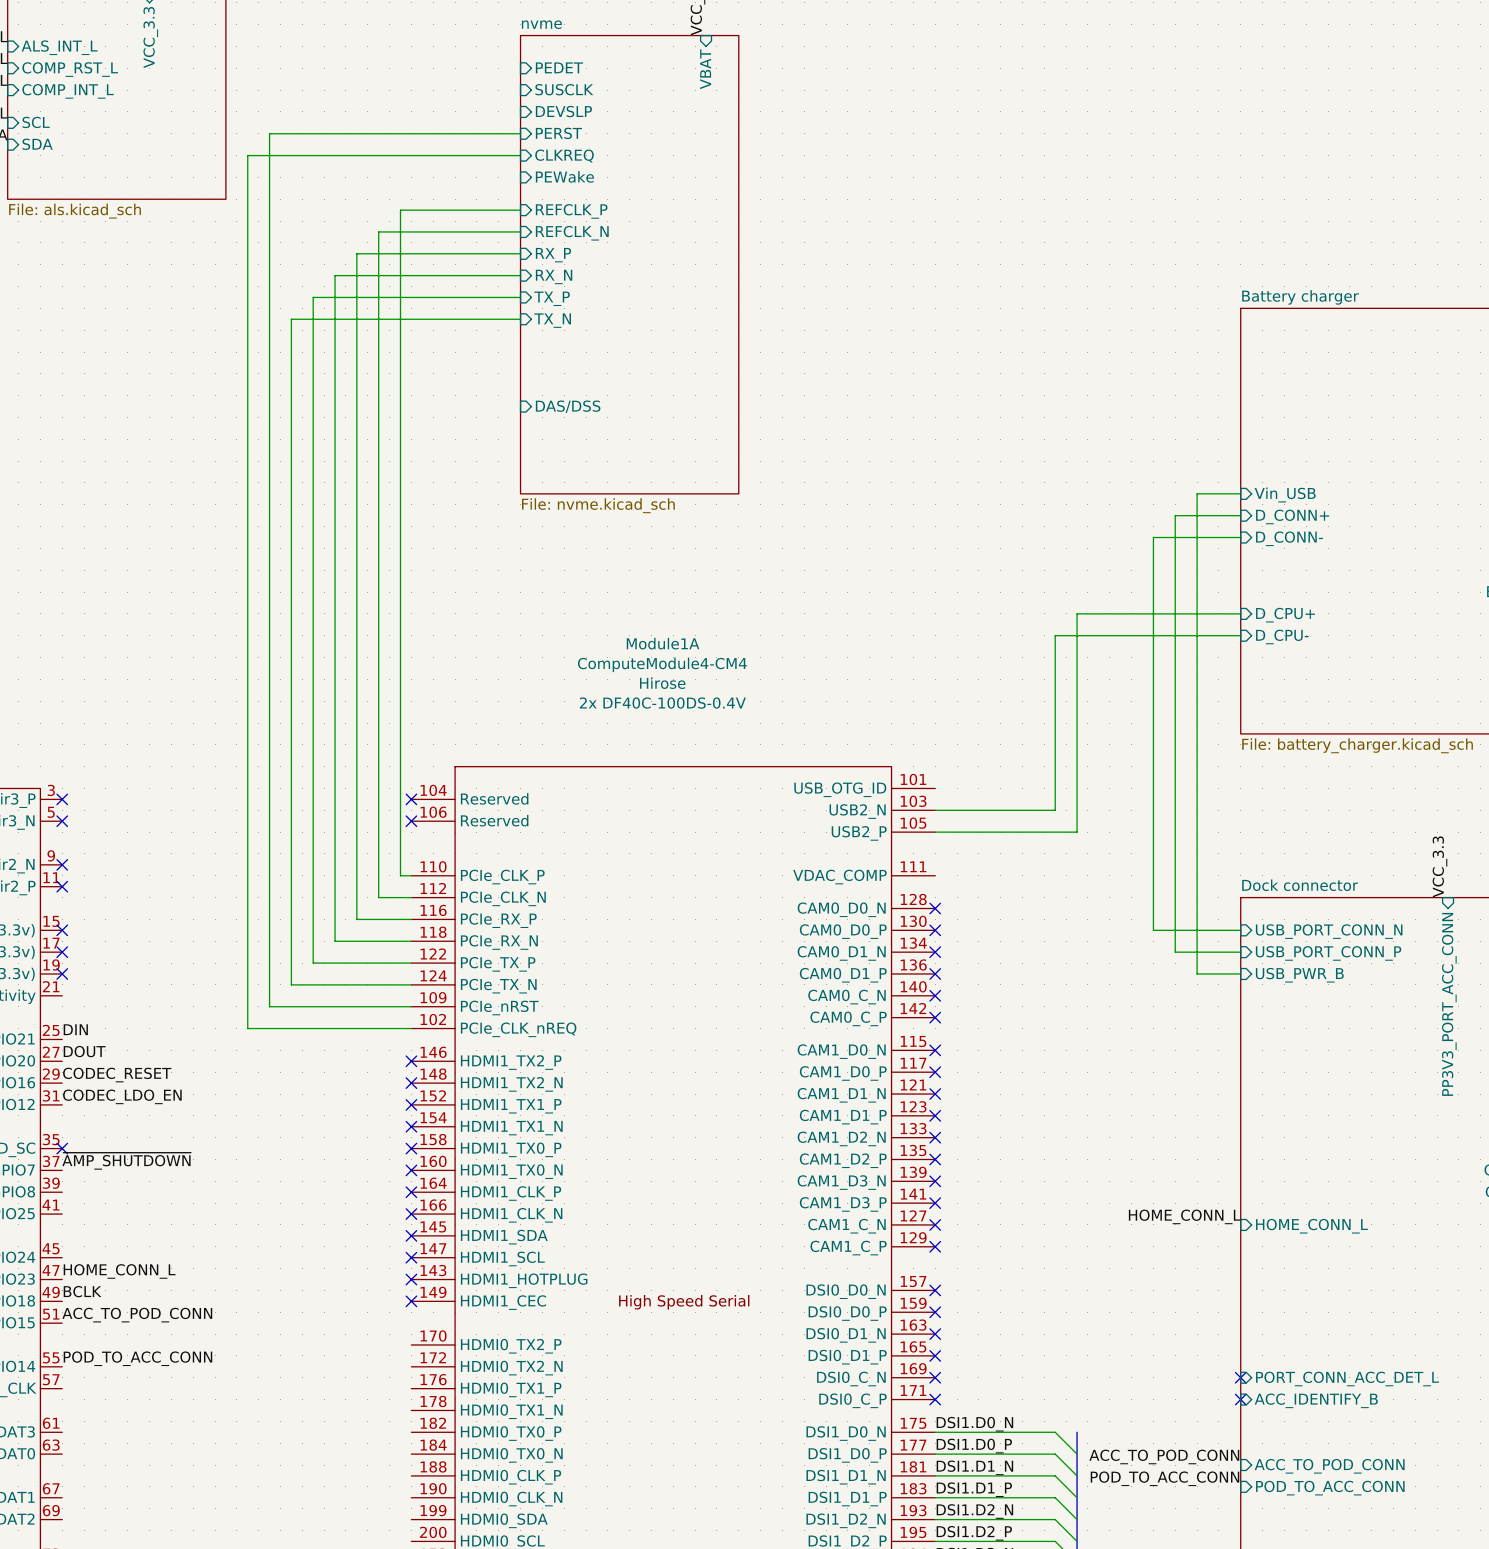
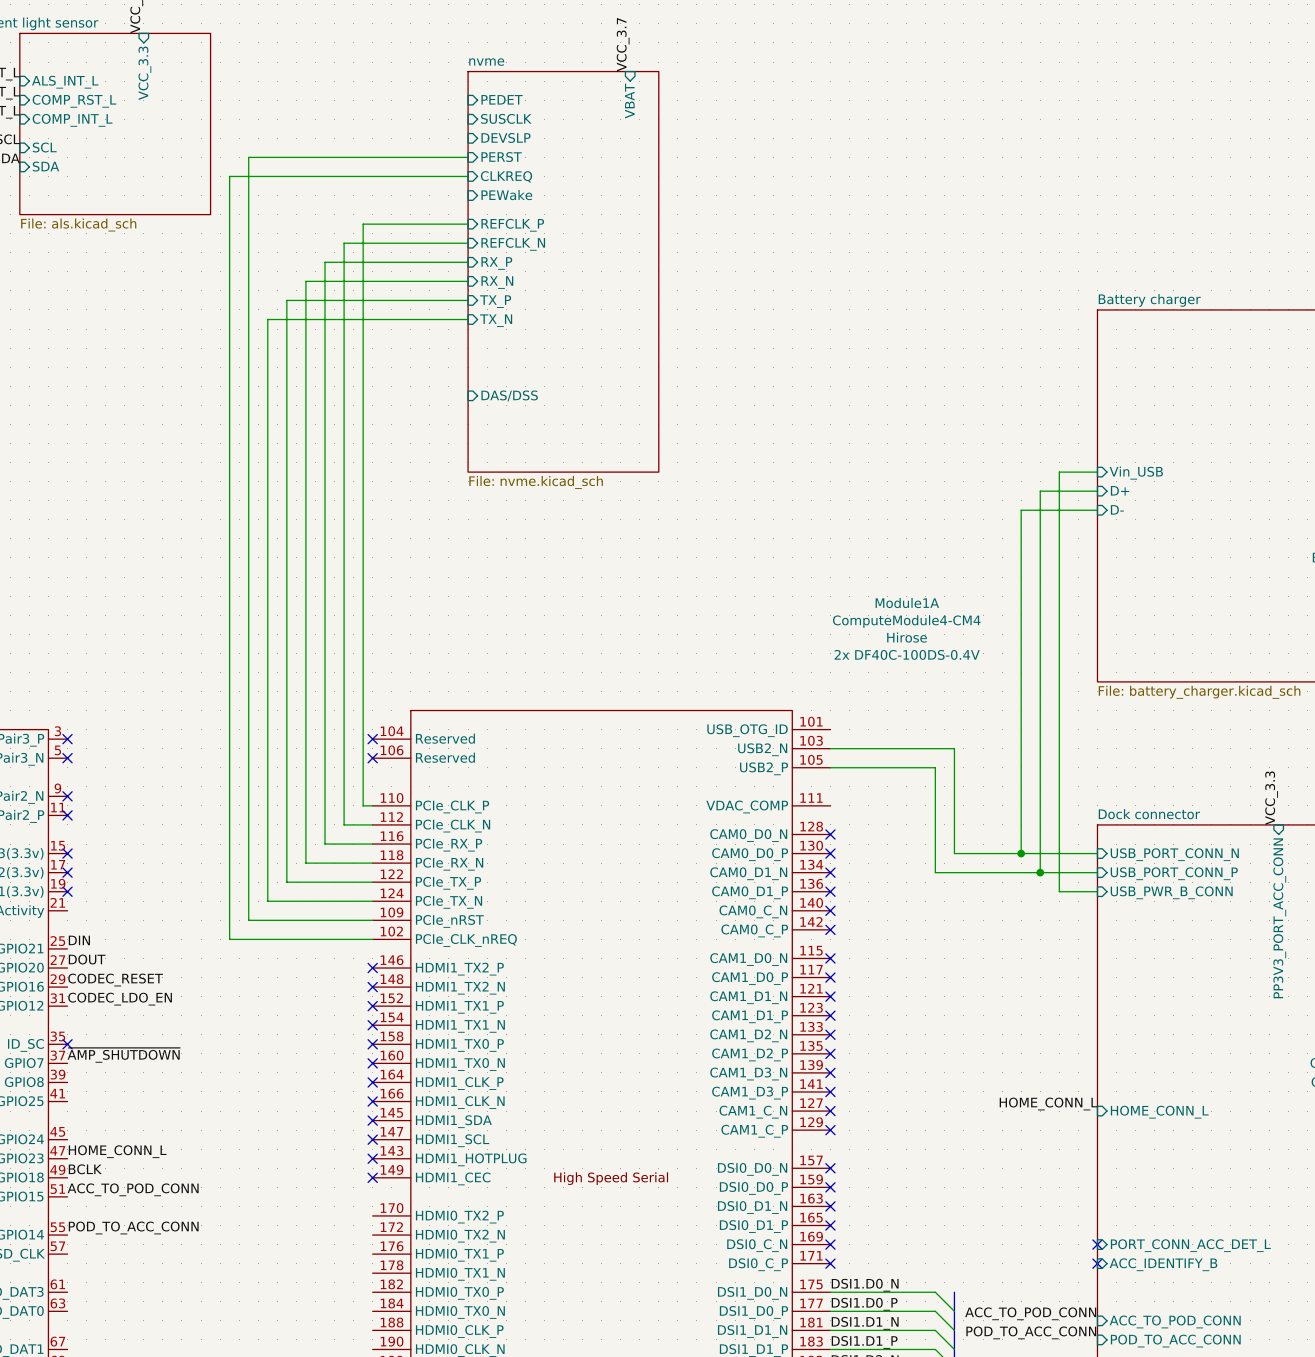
sheet pin: D_CONN+ (1292, 516) -> D+ (1120, 490)
sheet pin: D_CONN- (1289, 538) -> D- (1117, 509)
wire: (1240, 613) (1077, 613) (1077, 810) -> none
sheet pin: D_CPU+ (1285, 615) -> none
wire: (1240, 635) (1055, 635) (1055, 810) -> (954, 748) (935, 748)
sheet pin: D_CPU- (1282, 636) -> none
Module1A name position: Module1A (663, 643) -> Module1A (907, 603)
Module1A value position: ComputeModule4-CM4 (662, 664) -> ComputeModule4-CM4 (906, 621)
Module1A text position: Hirose (662, 683) -> Hirose (907, 637)
Module1A text position: 2x DF40C-100DS-0.4V (662, 703) -> 2x DF40C-100DS-0.4V (907, 654)
wire: (1055, 832) (1077, 832) -> (1021, 853) (954, 853) (954, 767)
wire: none -> (935, 767) (935, 872) (1040, 872)
junction: none -> (1021, 853)
junction: none -> (1040, 872)
sheet pin: USB_PWR_B (1299, 975) -> USB_PWR_B_CONN (1171, 892)

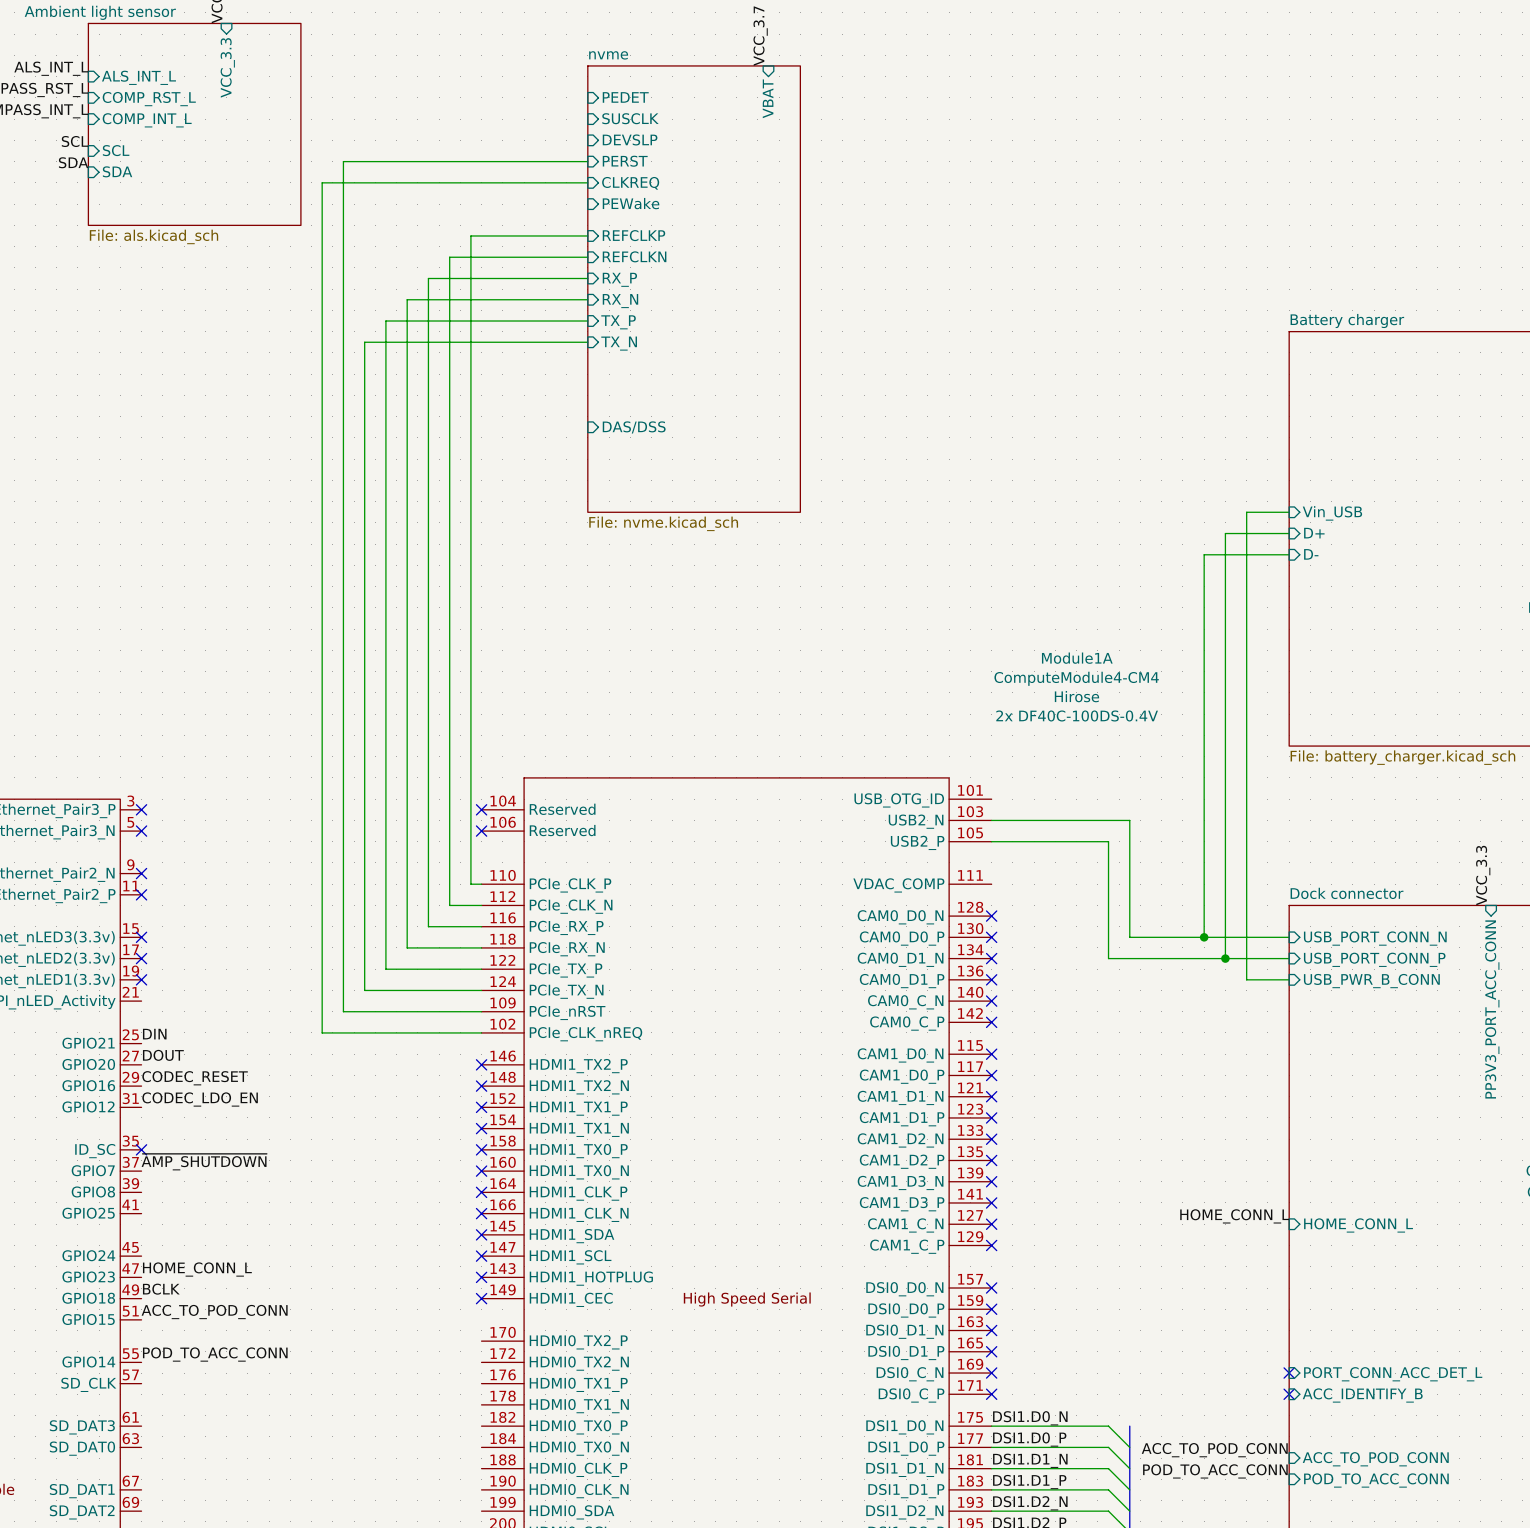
sheet pin: REFCLK_P (512, 225) -> REFCLKP (633, 235)
sheet pin: REFCLK_N (513, 244) -> REFCLKN (634, 256)

